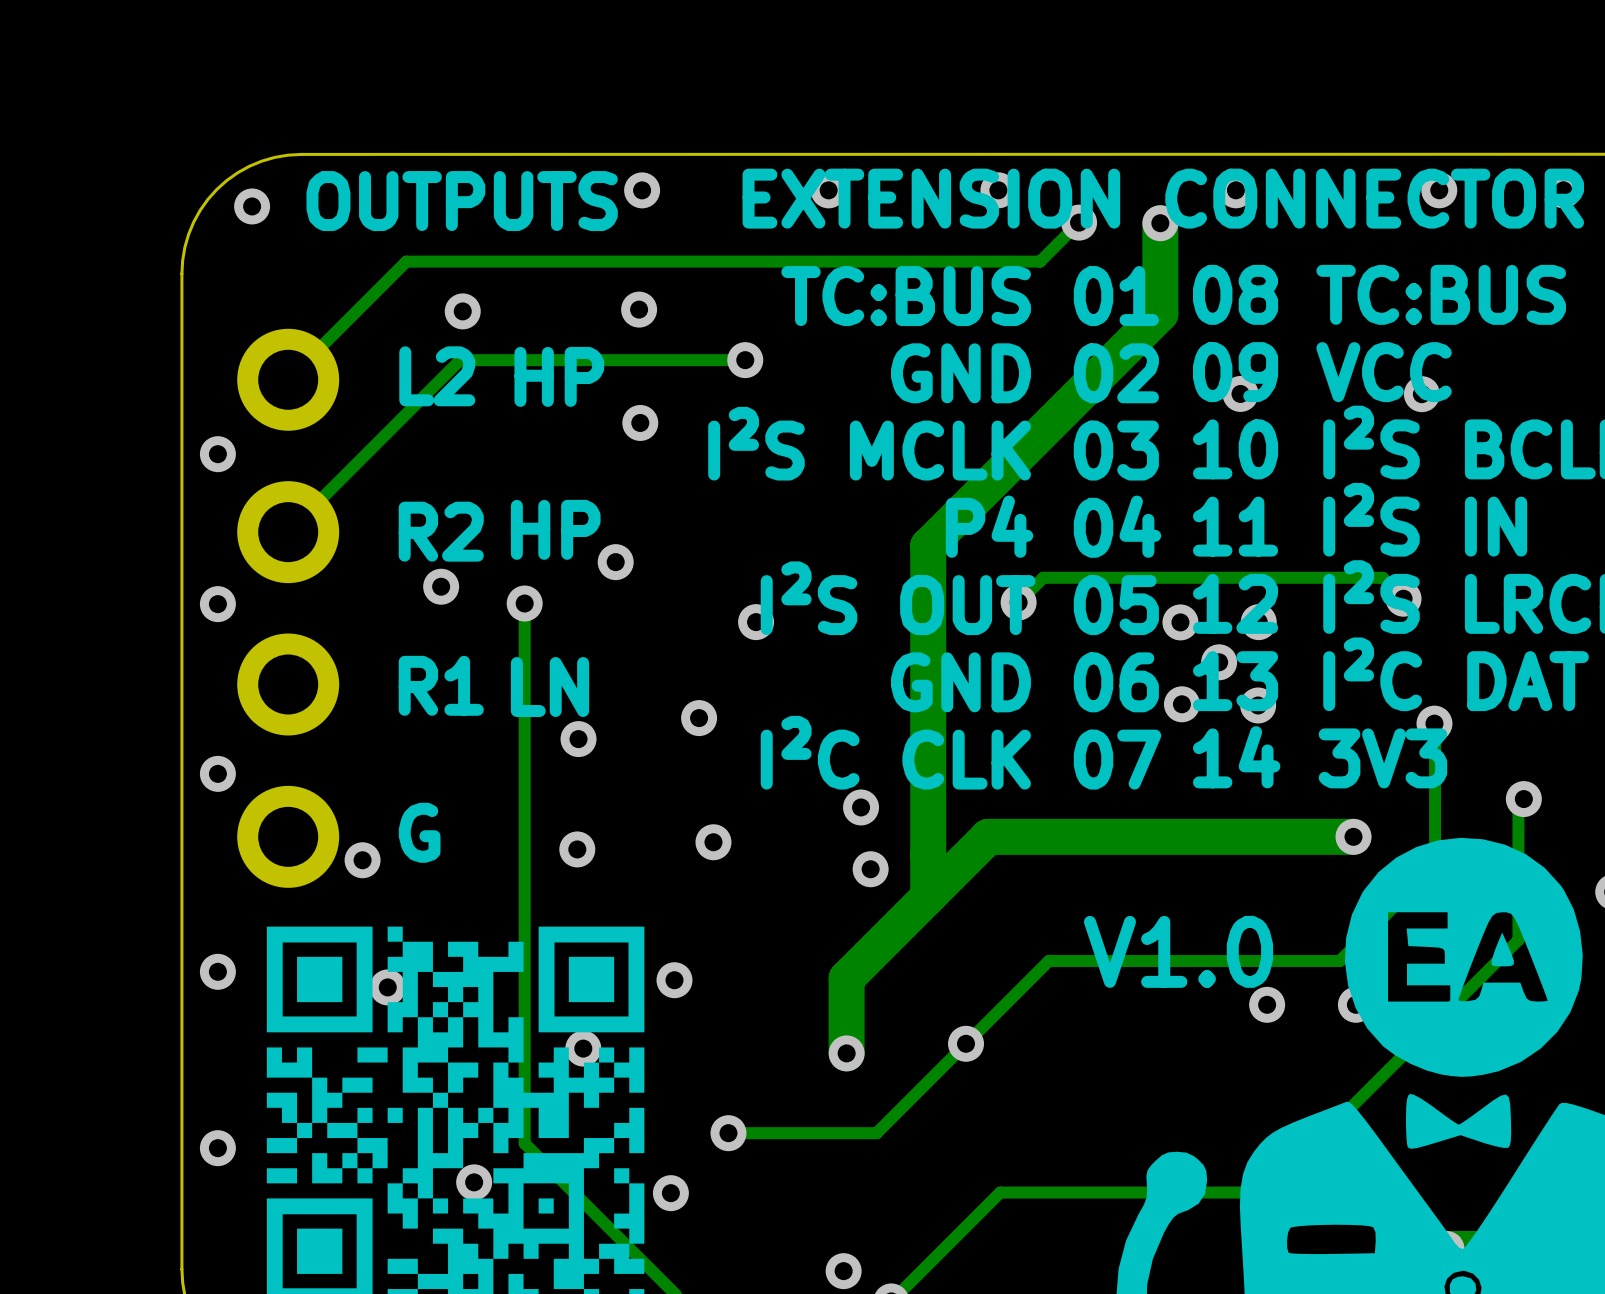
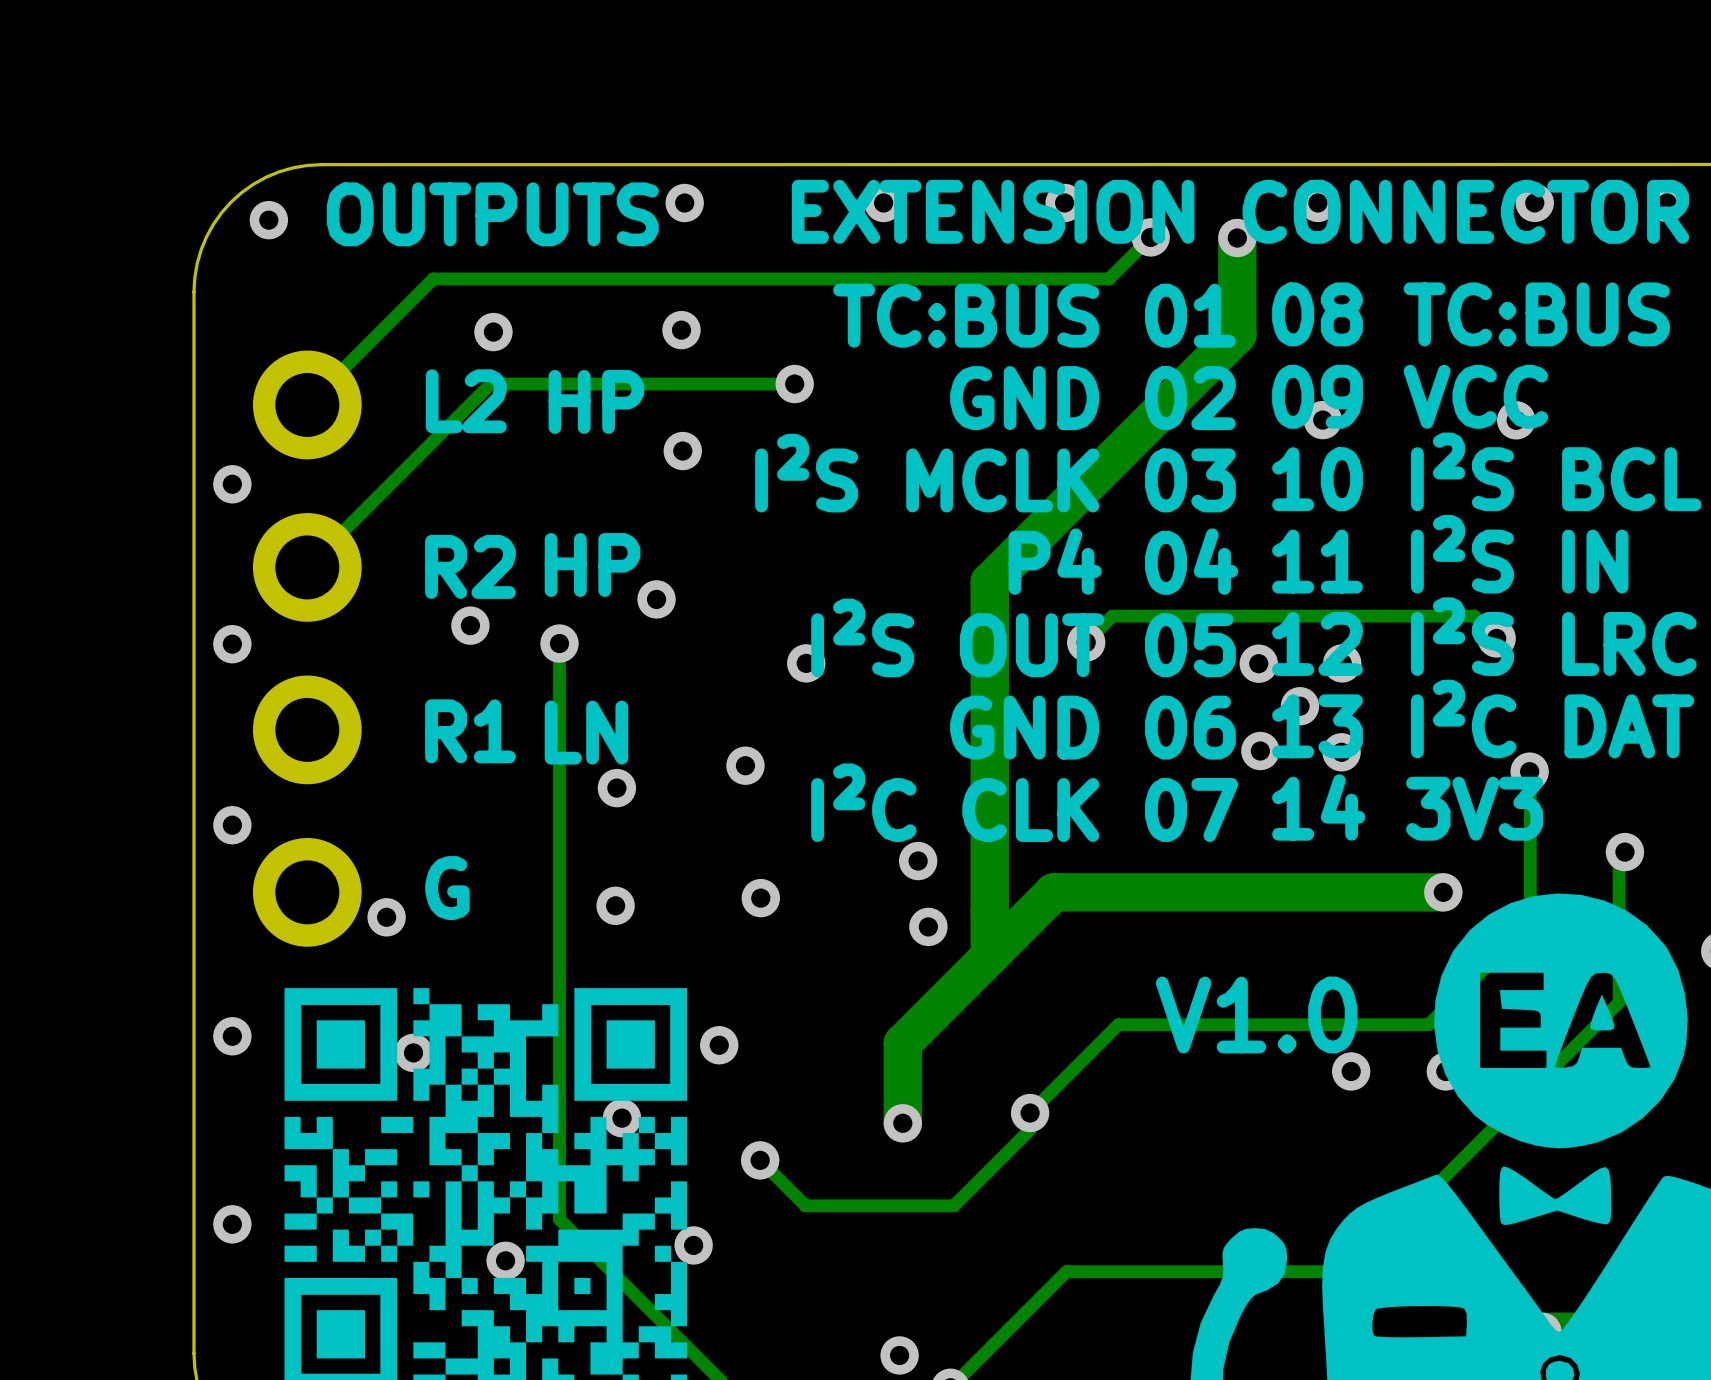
track: (966, 1043) (876, 1133) (728, 1133) -> (1030, 1113) (1030, 1129) (953, 1205) (805, 1205) (760, 1160)
via: none -> (760, 1160)
via: (728, 1133) -> none
via position: (670, 1193) -> (693, 1245)

